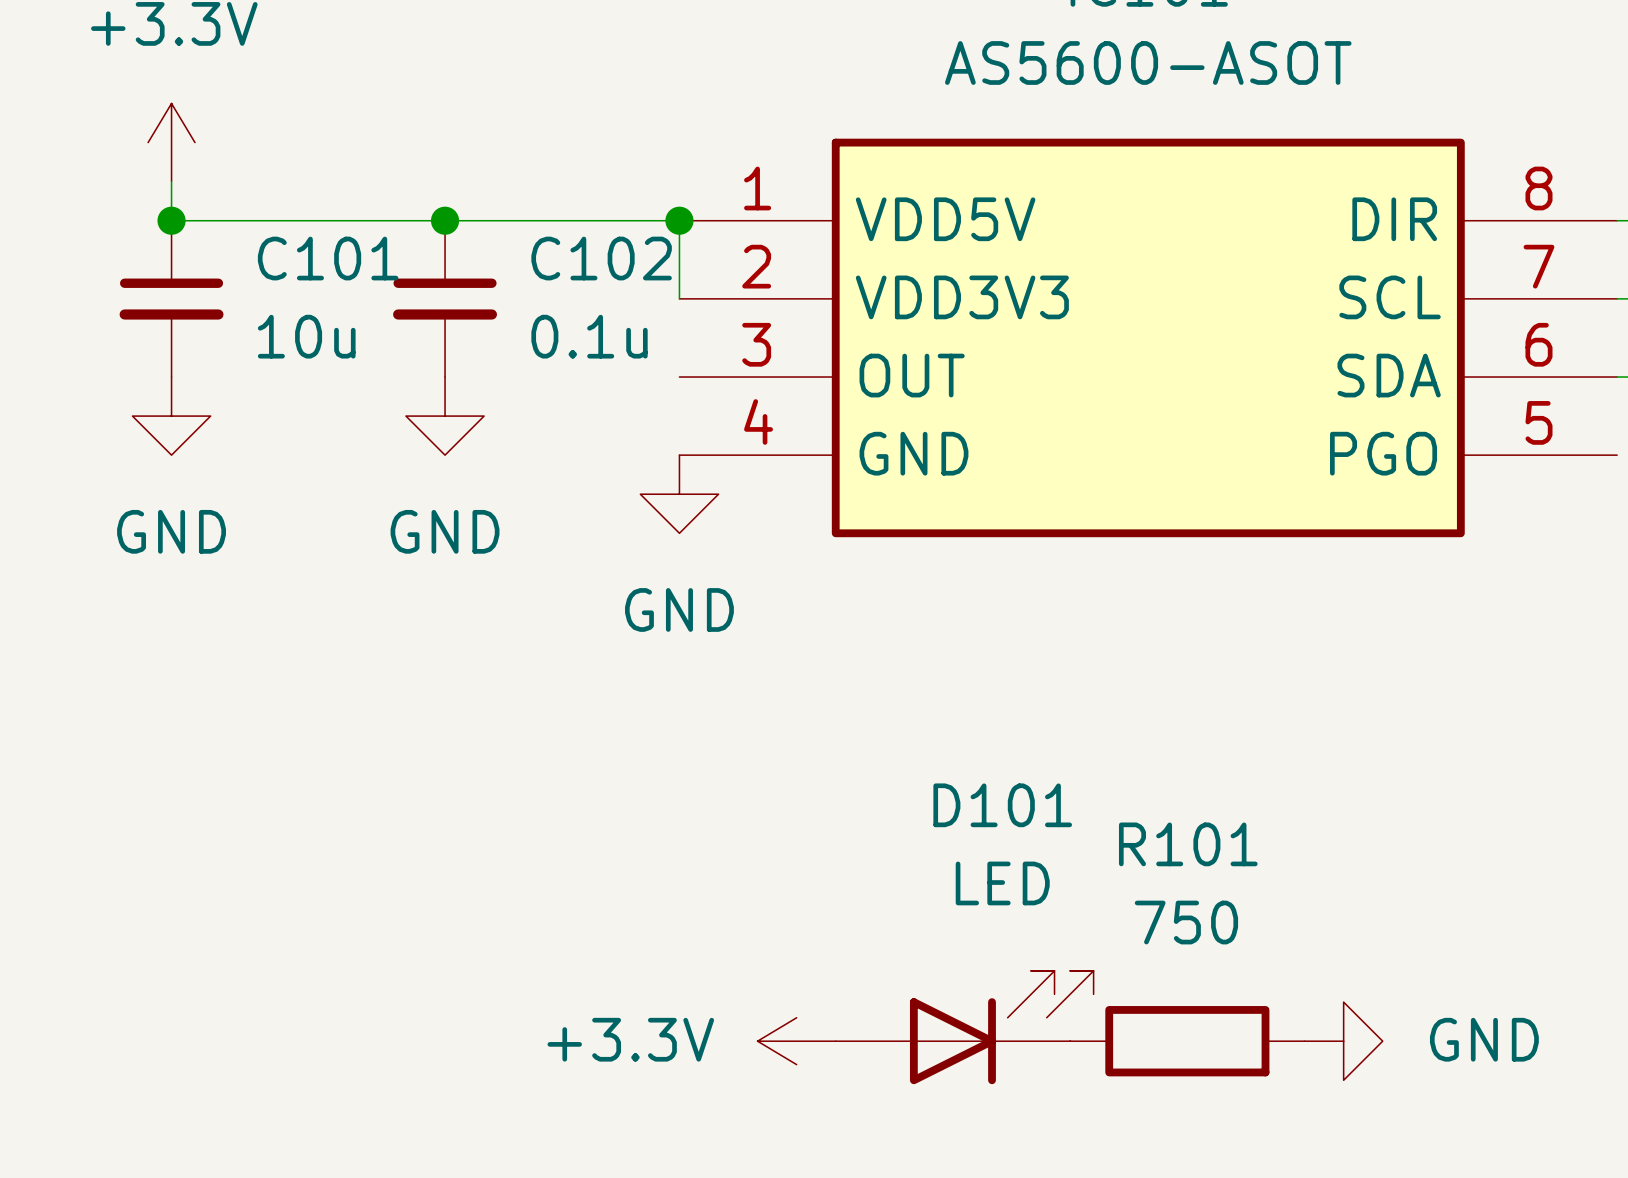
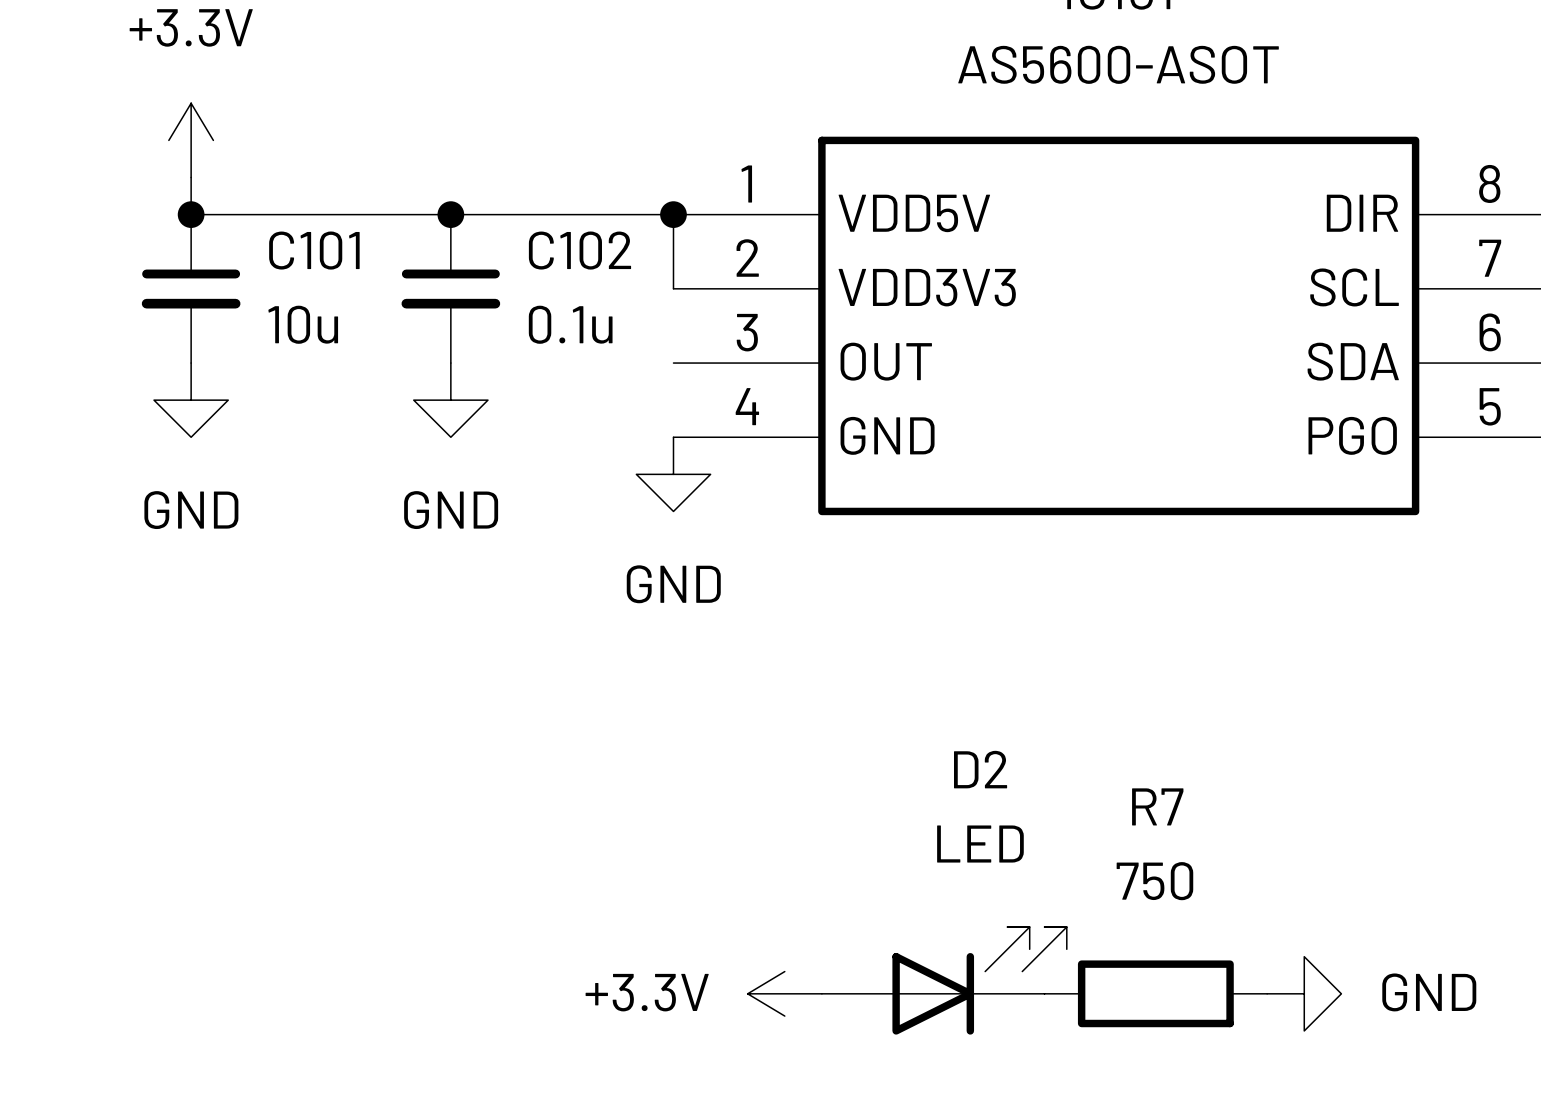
D101 name: D101 (1002, 805) -> D2 (980, 769)
R101 name: R101 (1188, 844) -> R7 (1157, 806)

